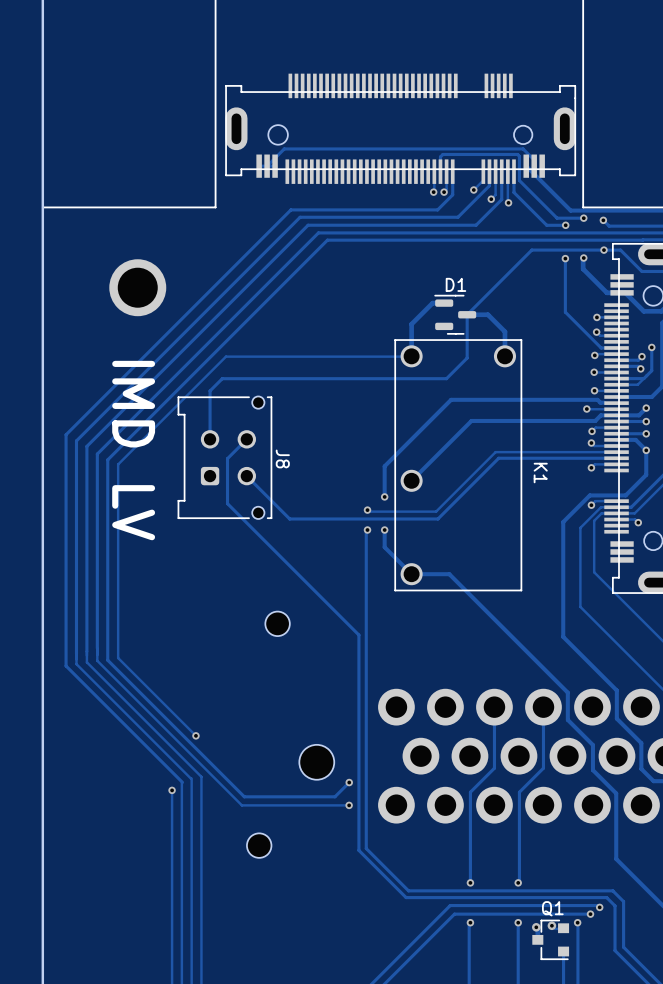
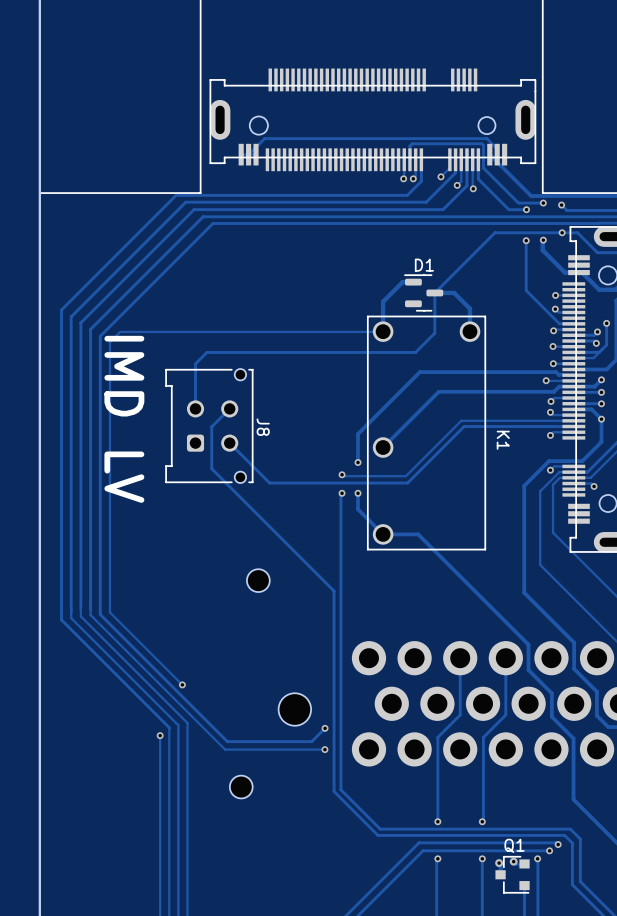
track: (290, 209) (66, 434) -> (270, 195) (176, 195) (61, 310) (61, 404)
track: (300, 217) (76, 440) -> (279, 202) (185, 202) (71, 316) (71, 410)
track: (308, 225) (86, 446) -> (286, 209) (194, 209) (80, 322) (80, 415)
track: (318, 232) (97, 454) -> (296, 216) (203, 216) (90, 329) (90, 422)
track: (327, 240) (107, 459) -> (304, 223) (212, 223) (100, 336) (100, 428)
part: (137, 287) -> none
track: (225, 356) (118, 464) -> (210, 331) (120, 331) (109, 342) (109, 432)

